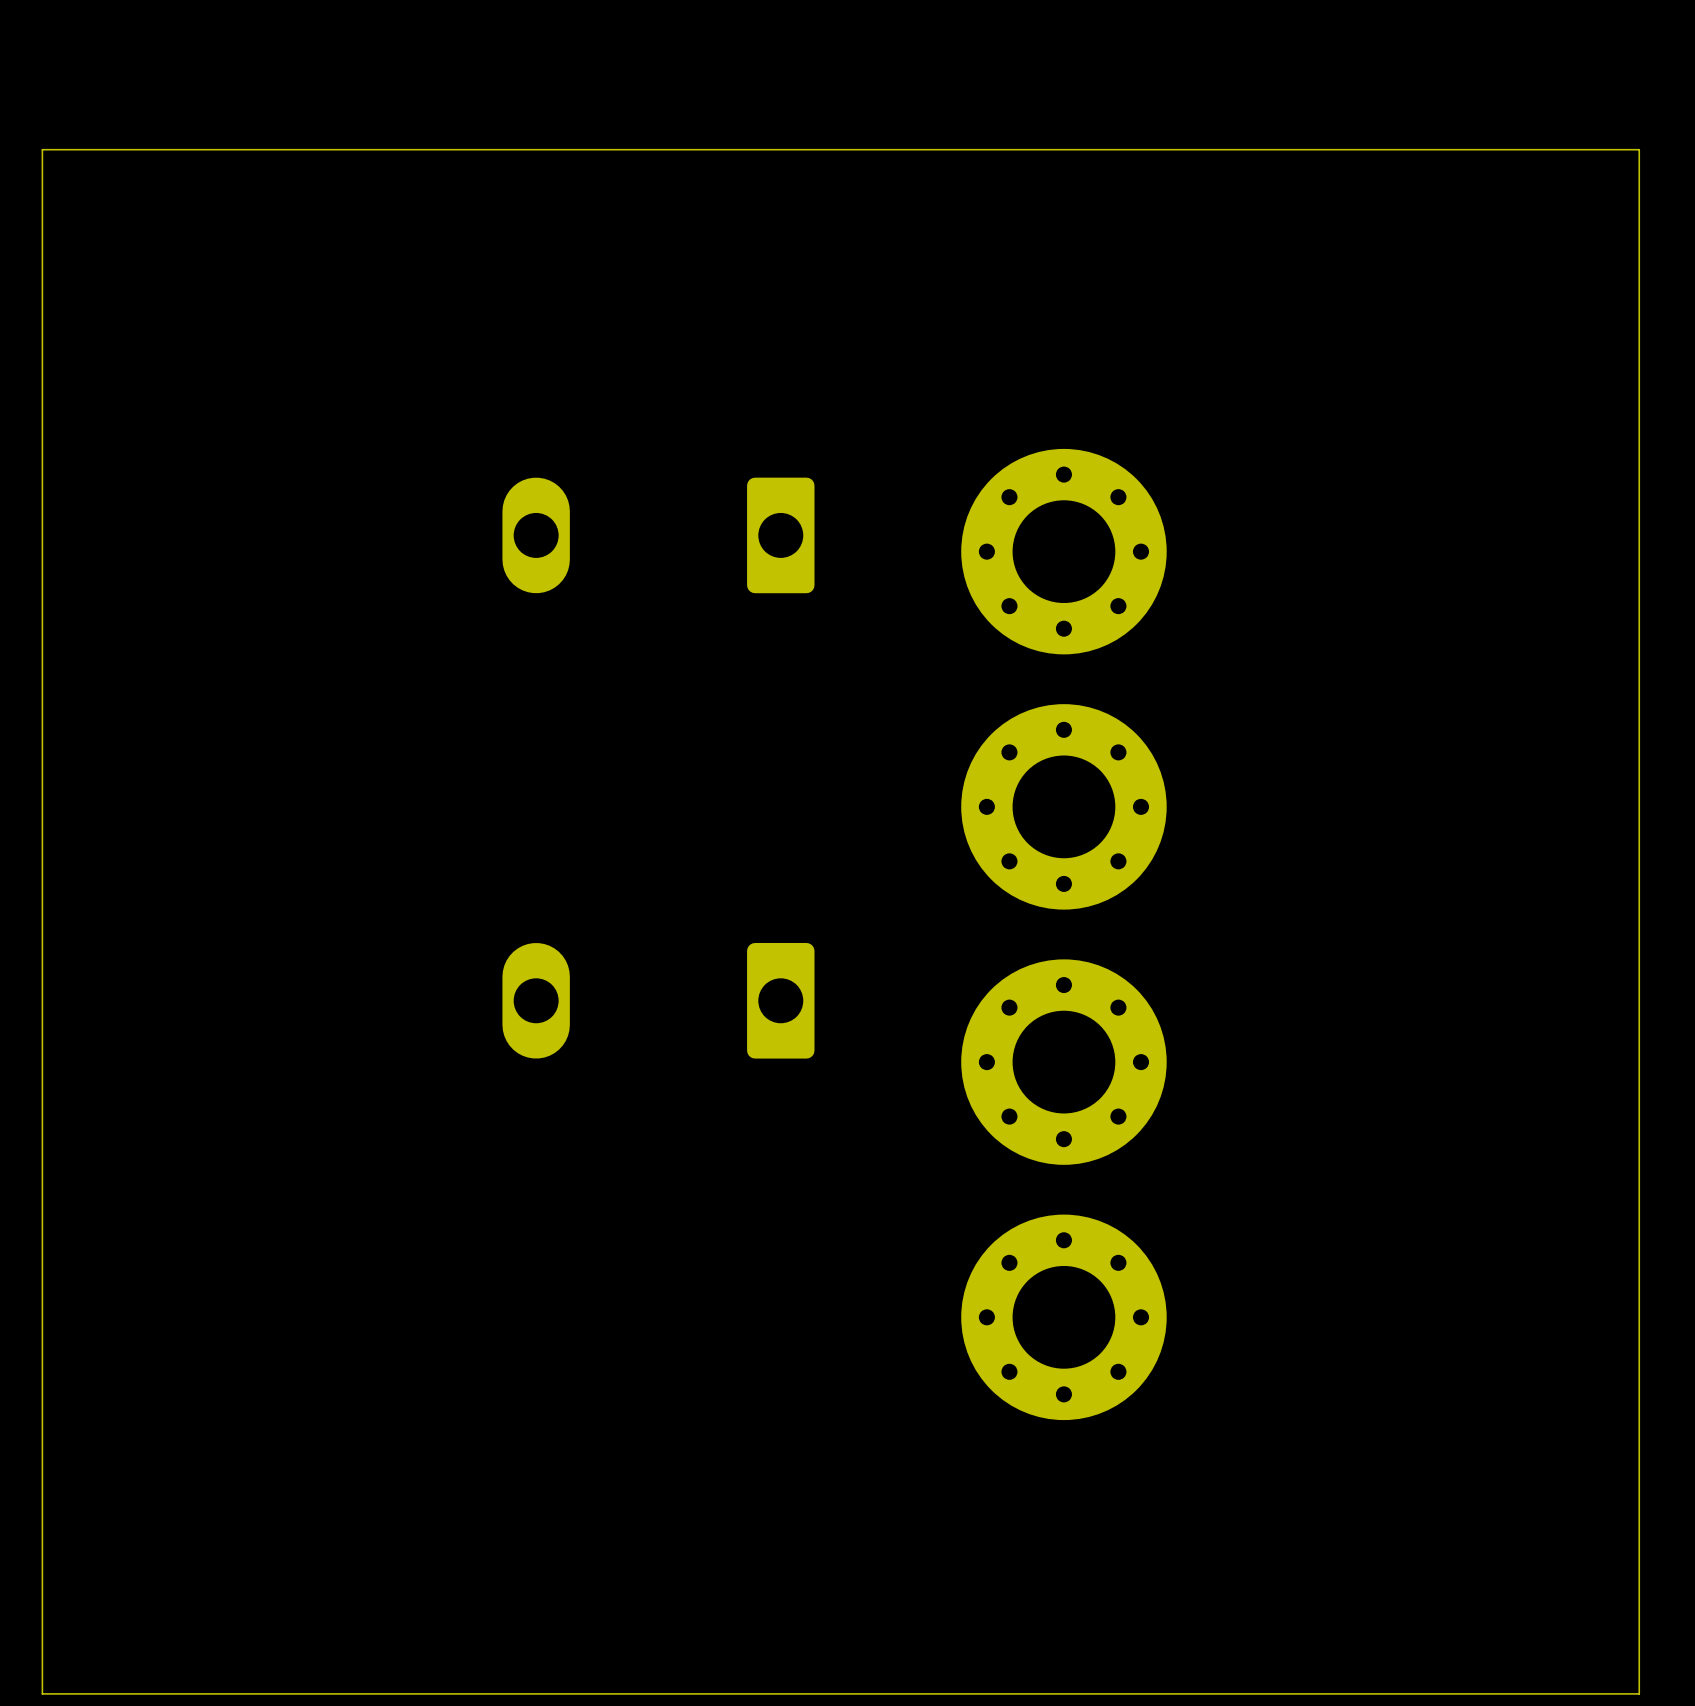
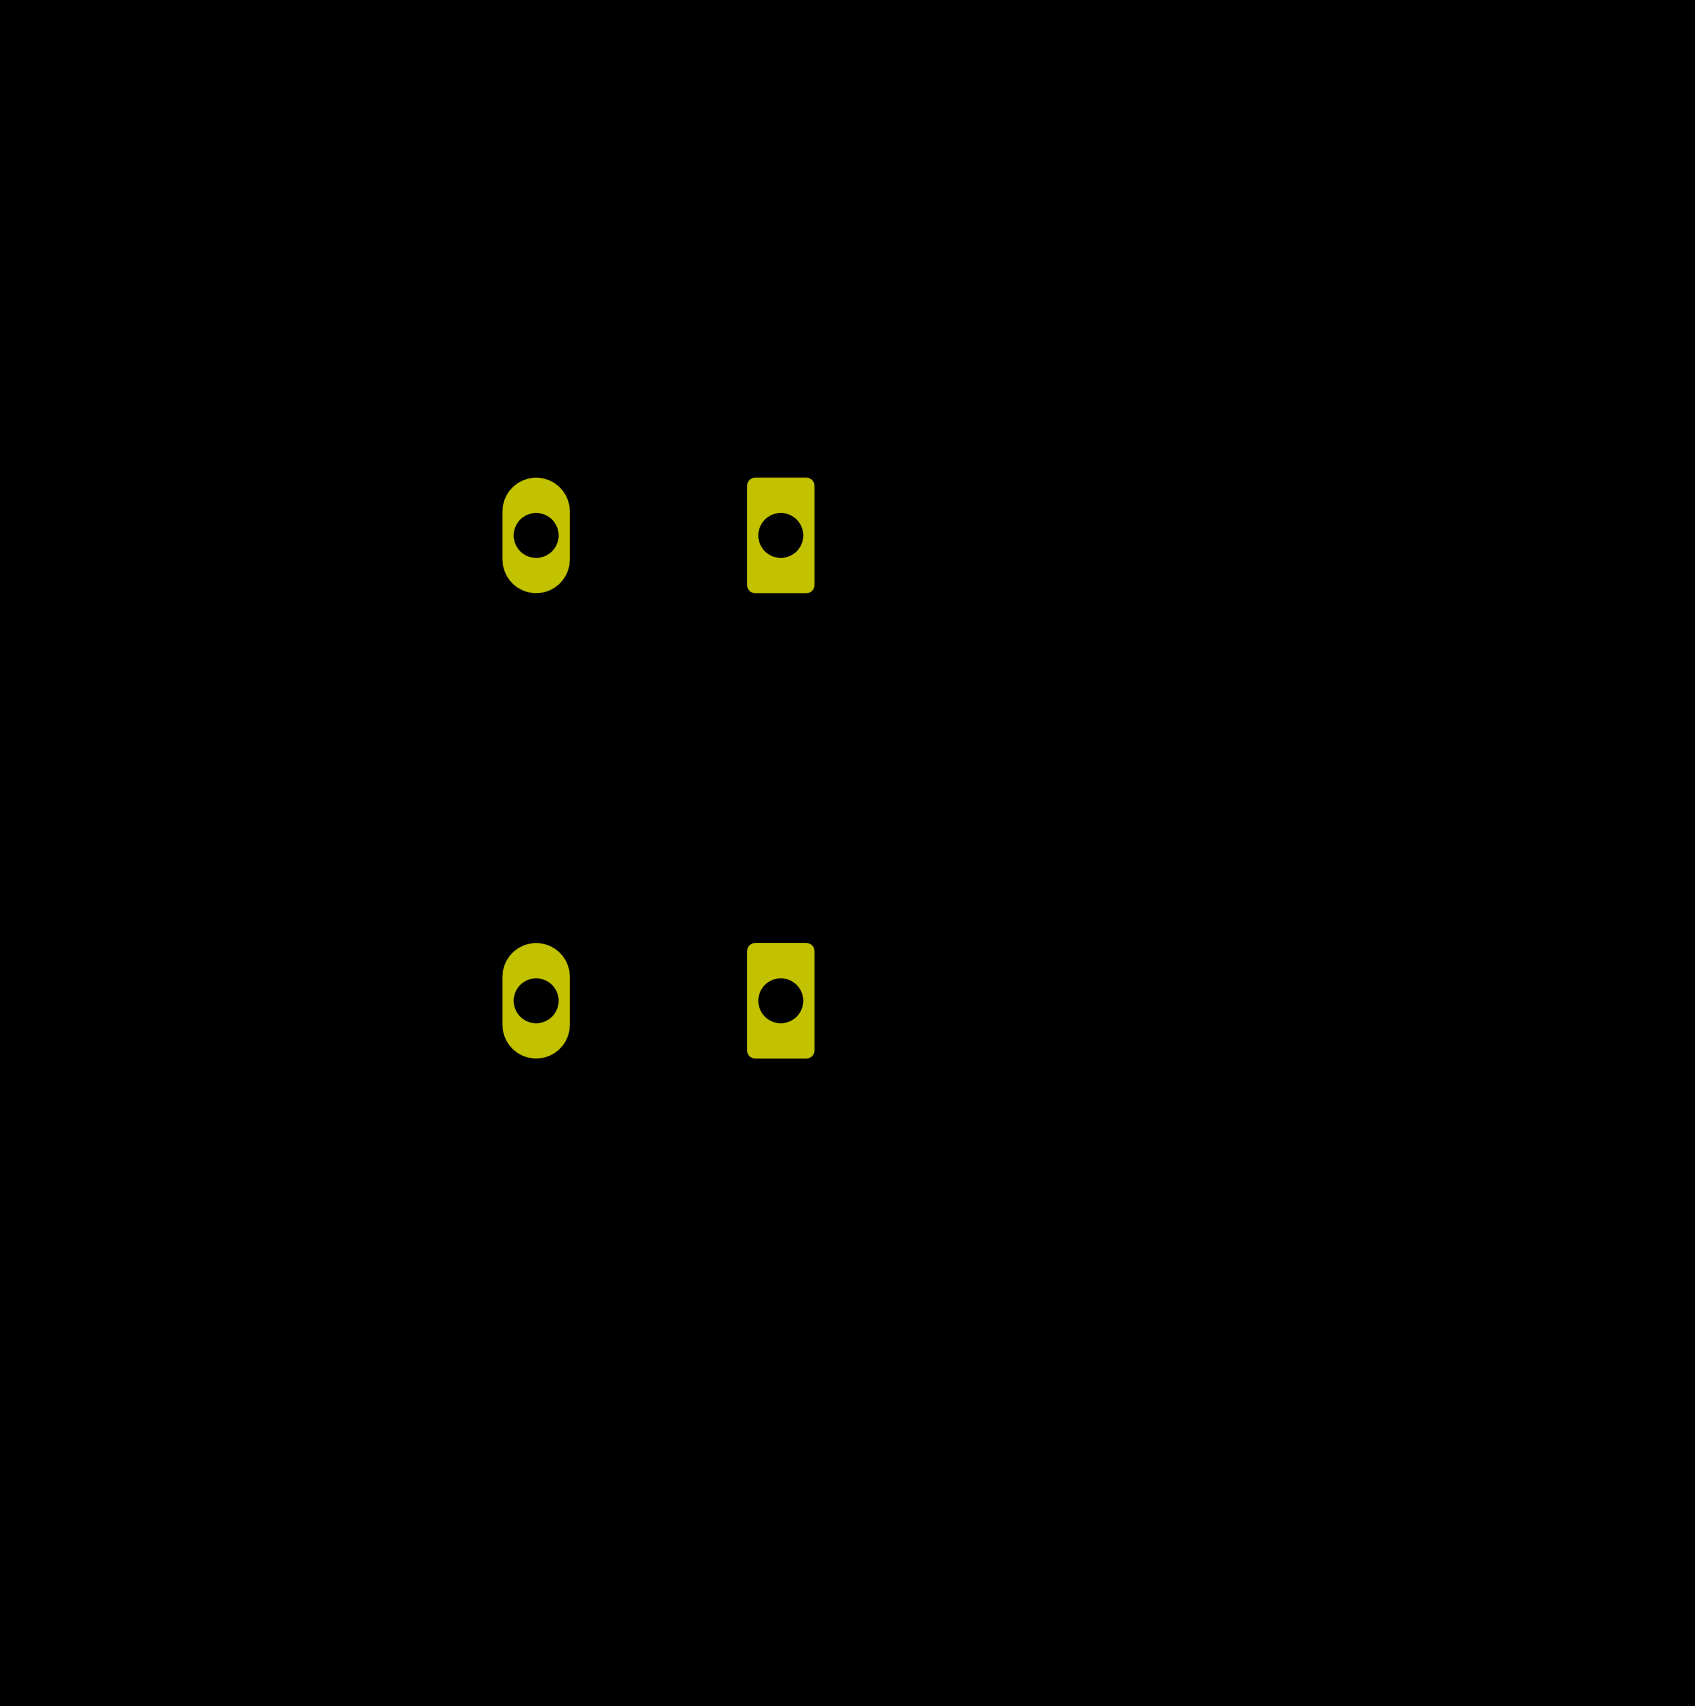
board edge: (1639, 149) (42, 149) (42, 1693) (1639, 1693) (1639, 149) -> none
part: (1063, 551) -> none
part: (1063, 806) -> none
part: (1063, 1062) -> none
part: (1063, 1317) -> none

